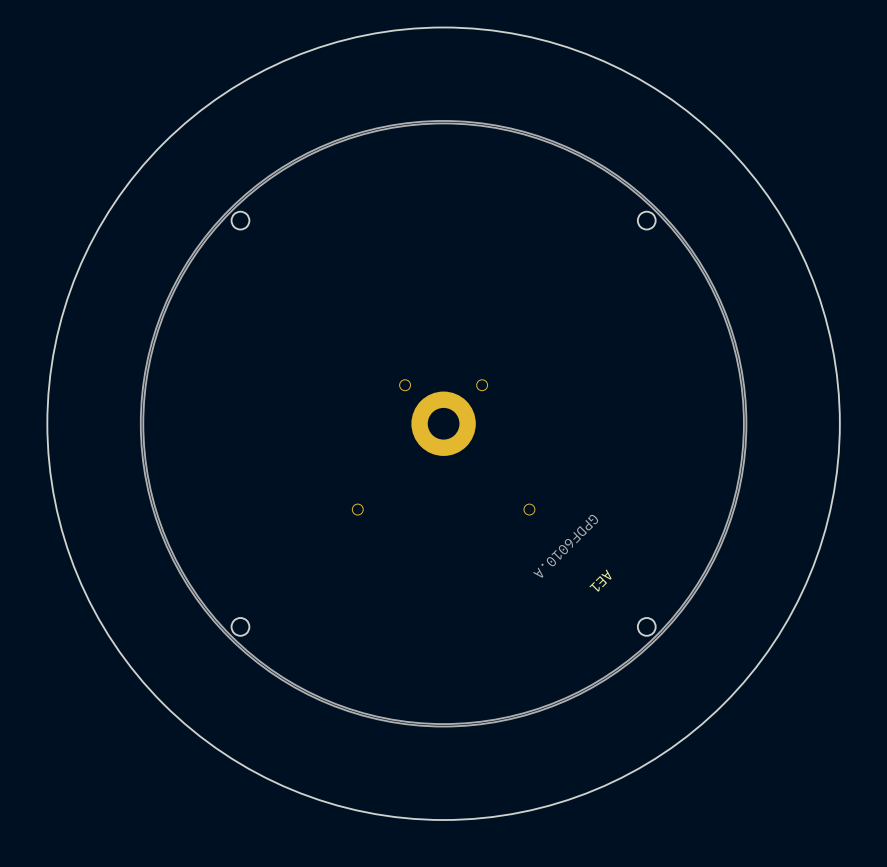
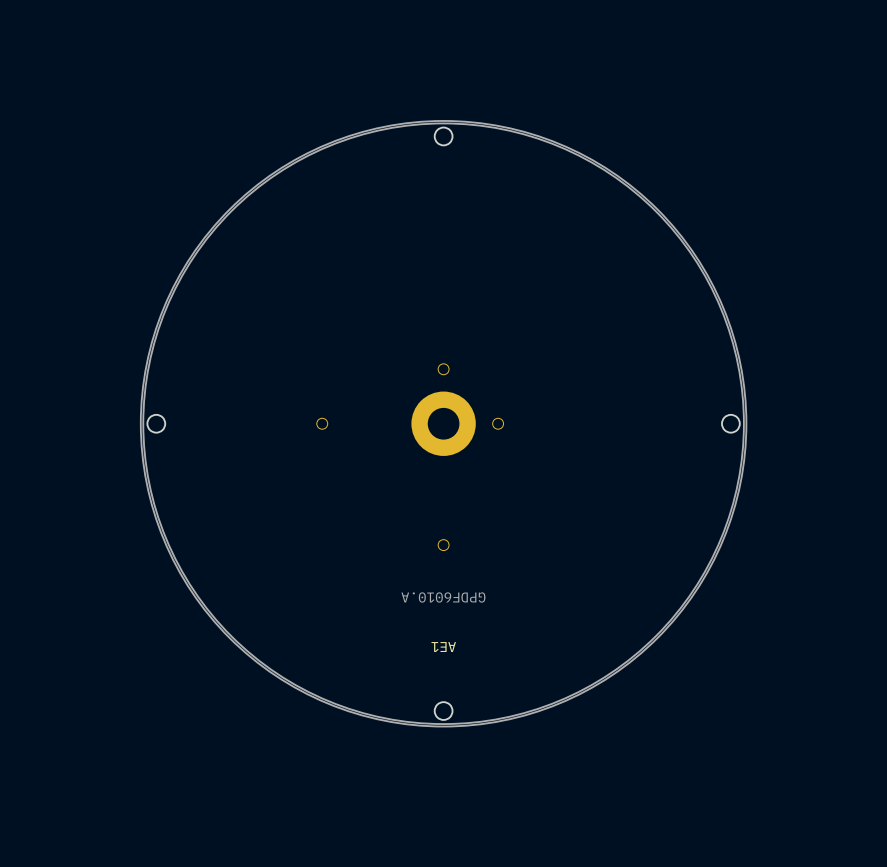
round board edge: [47, 27, 841, 821] -> none
AE1 rotation: 0° (443, 423) -> 45° clockwise (443, 423)

